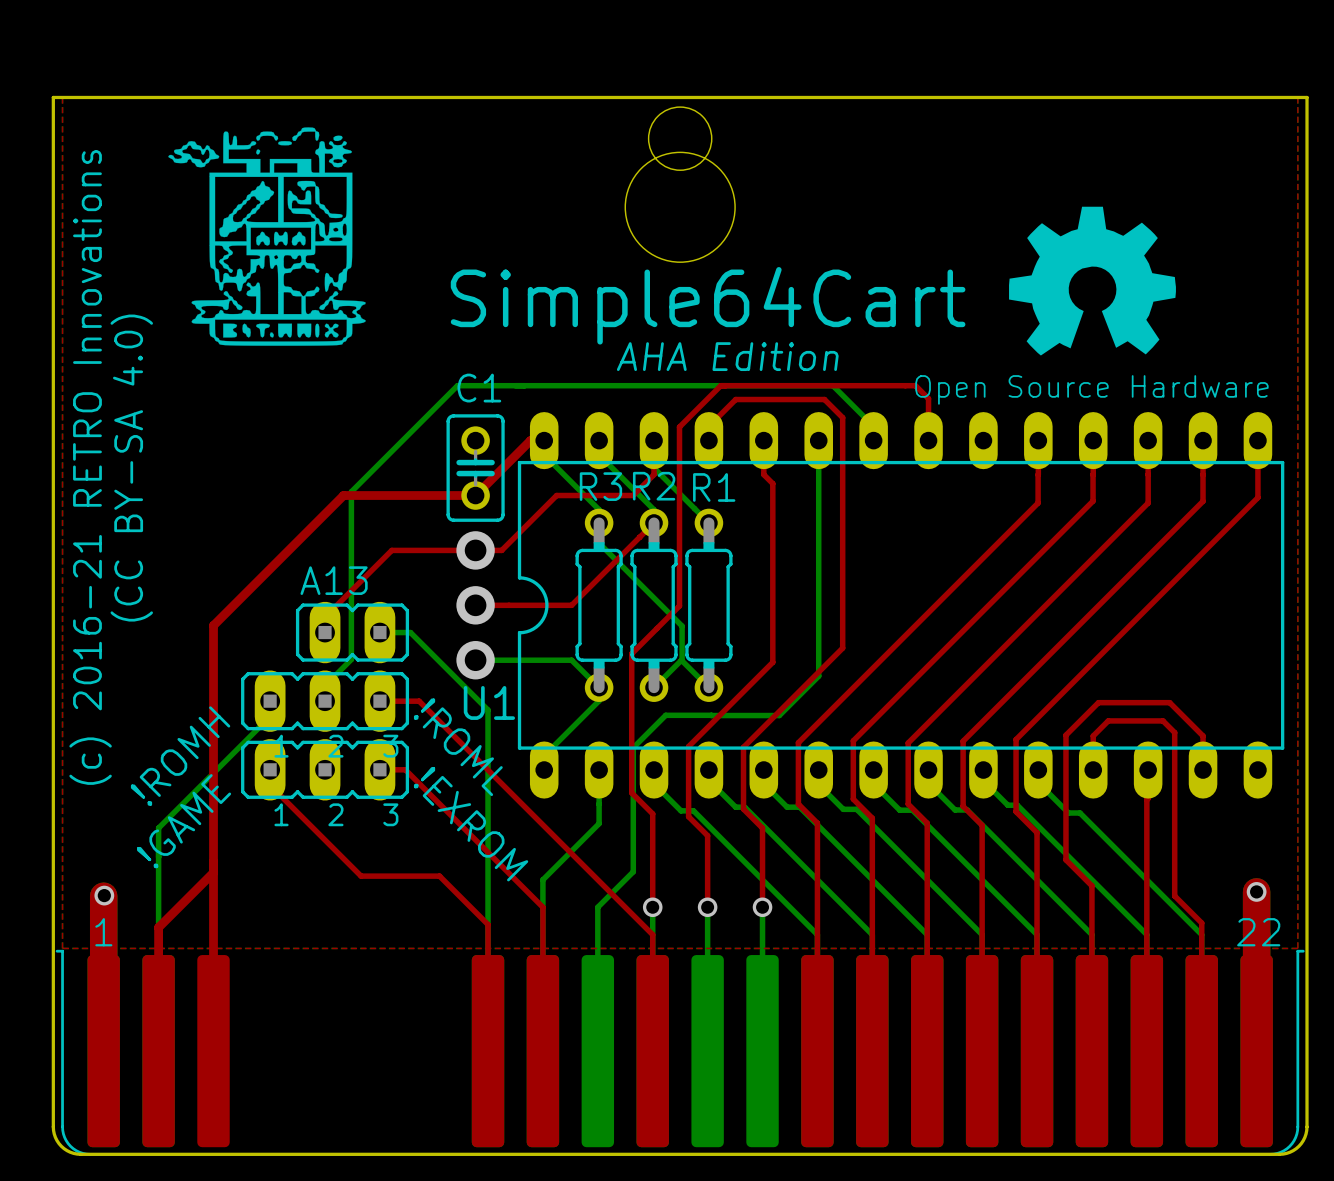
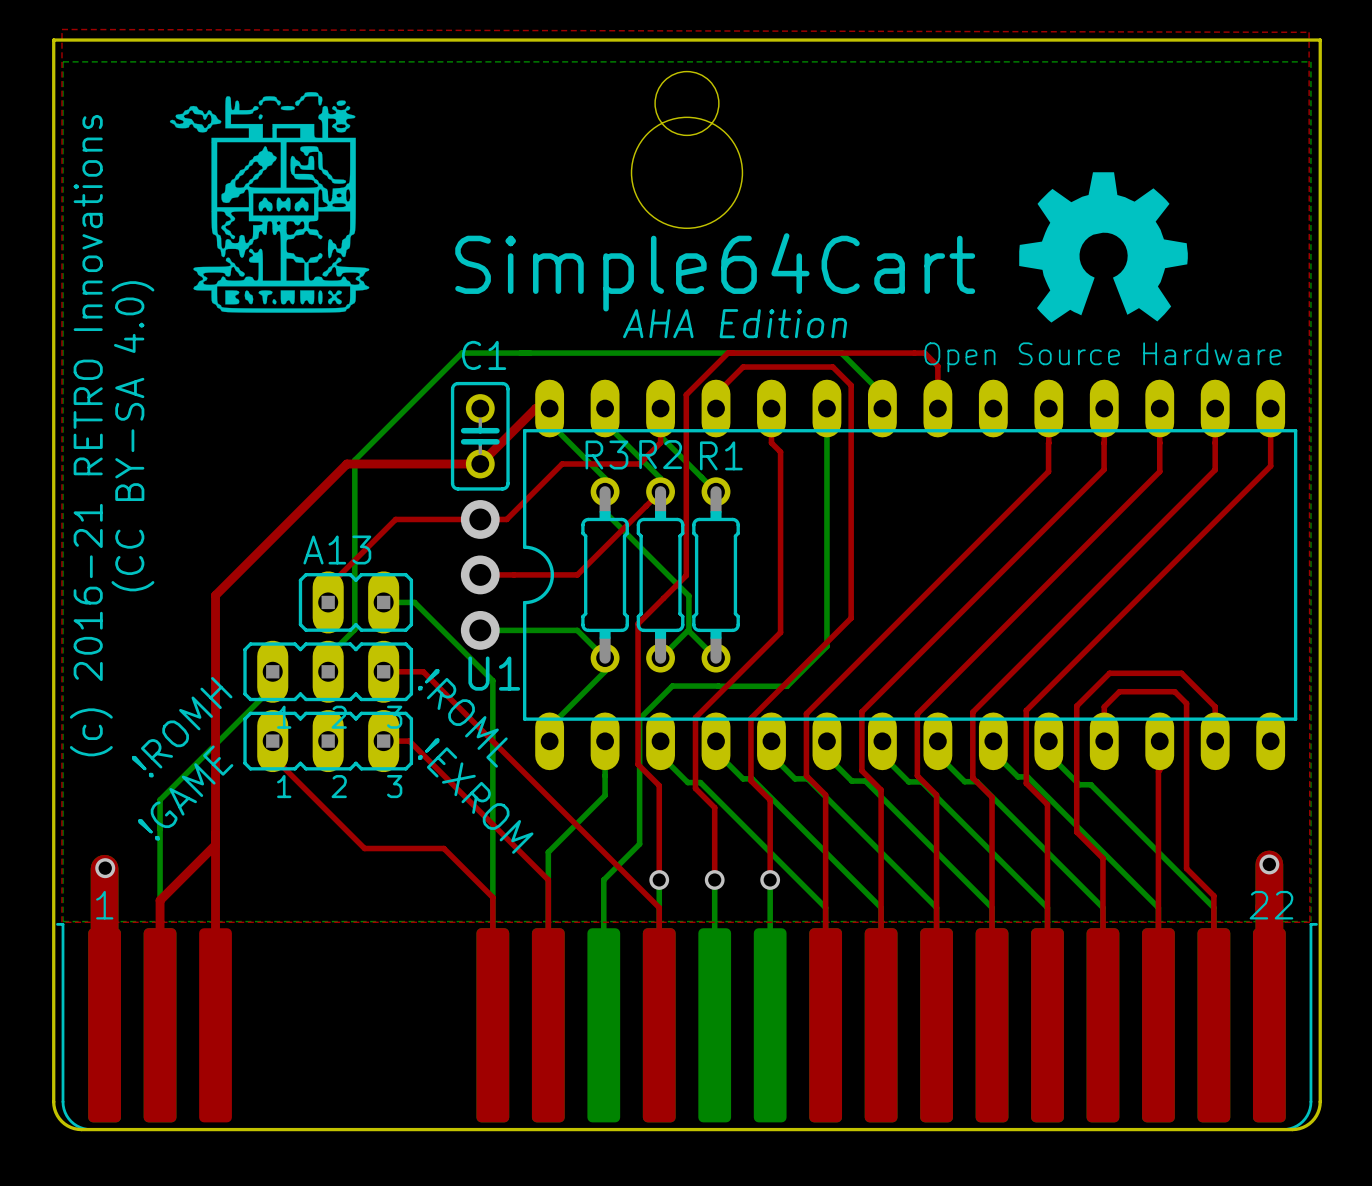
board edge: (53, 97) (1307, 97) -> (53, 61) (53, 40) (1320, 40) (1320, 61)
top zone outline: (62, 97) (1297, 97) (1297, 948) (62, 948) (62, 97) -> (61, 29) (61, 922) (1309, 922) (1309, 32) (61, 29)

